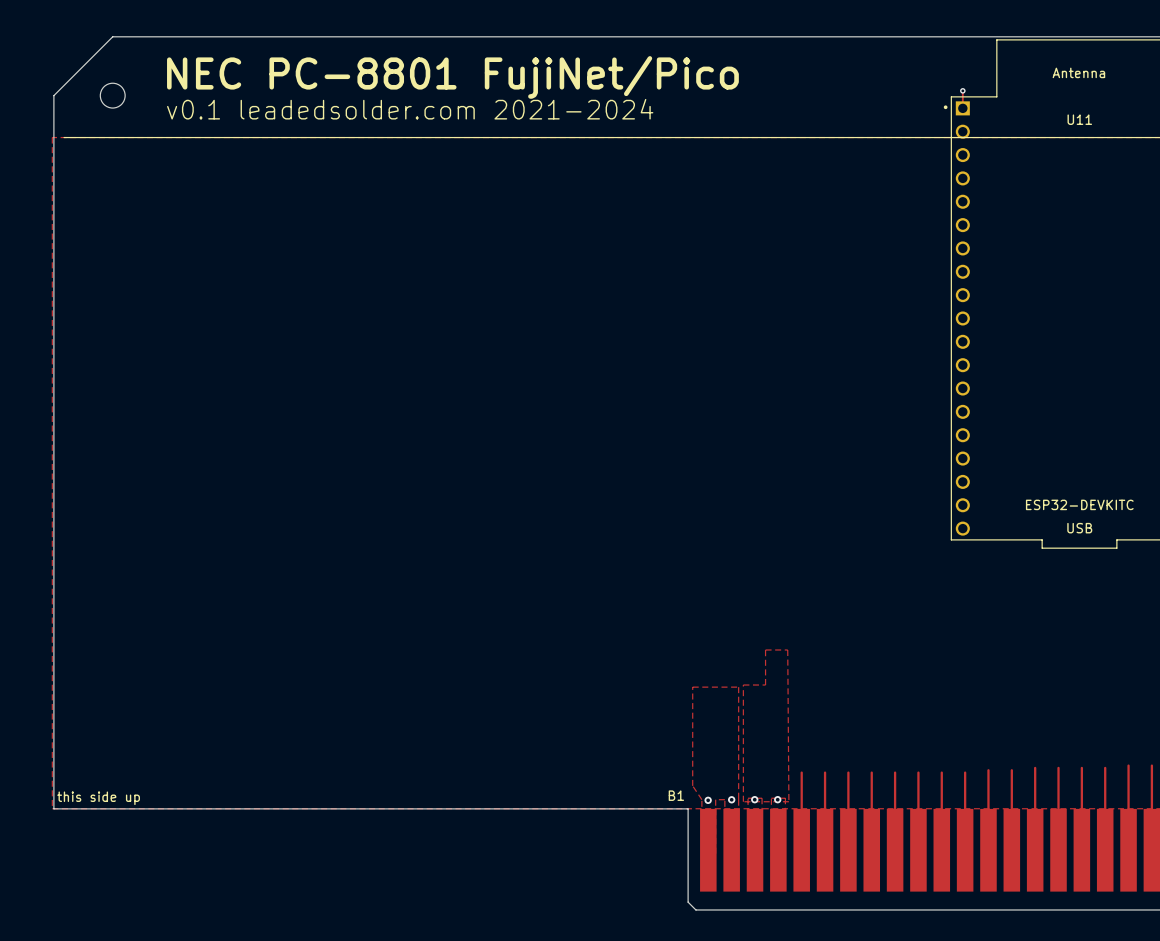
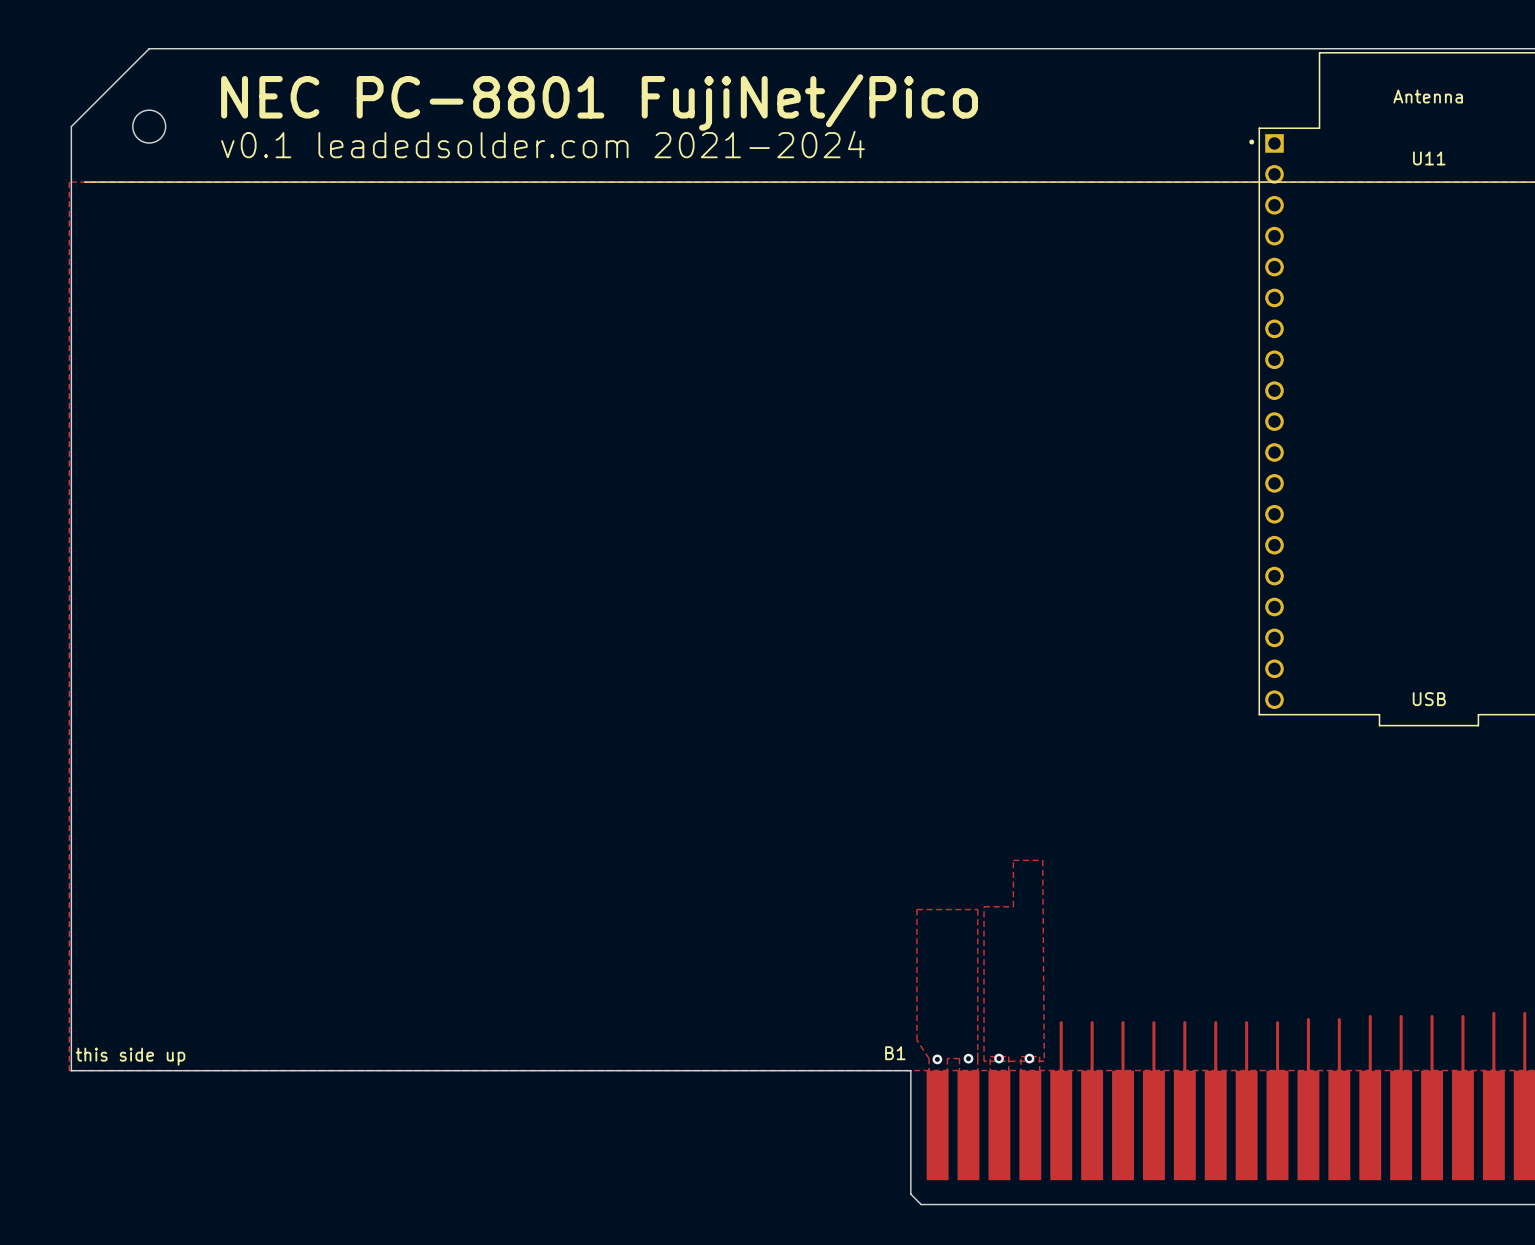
track: (962, 90) (962, 108) -> none
via: (962, 90) -> none
U11 value: ESP32-DEVKITC (1079, 504) -> none

